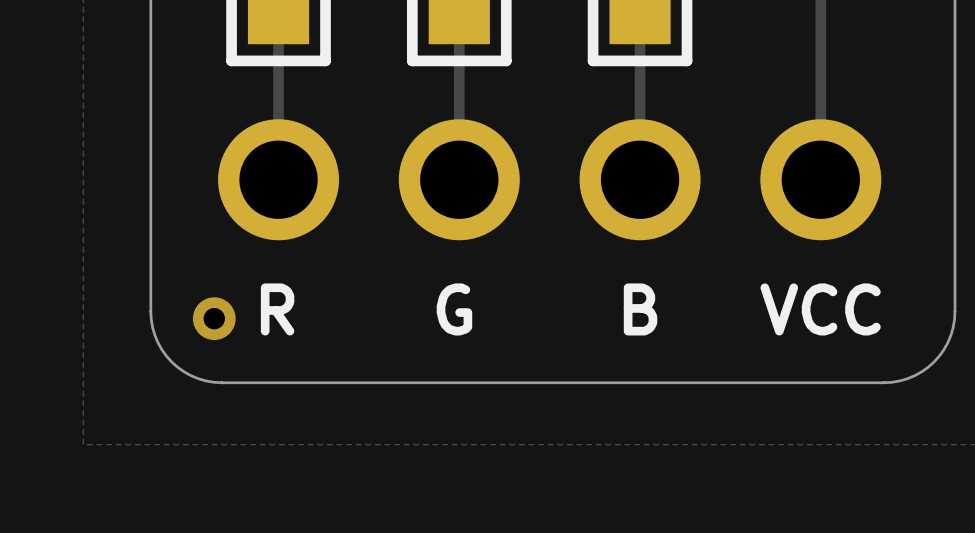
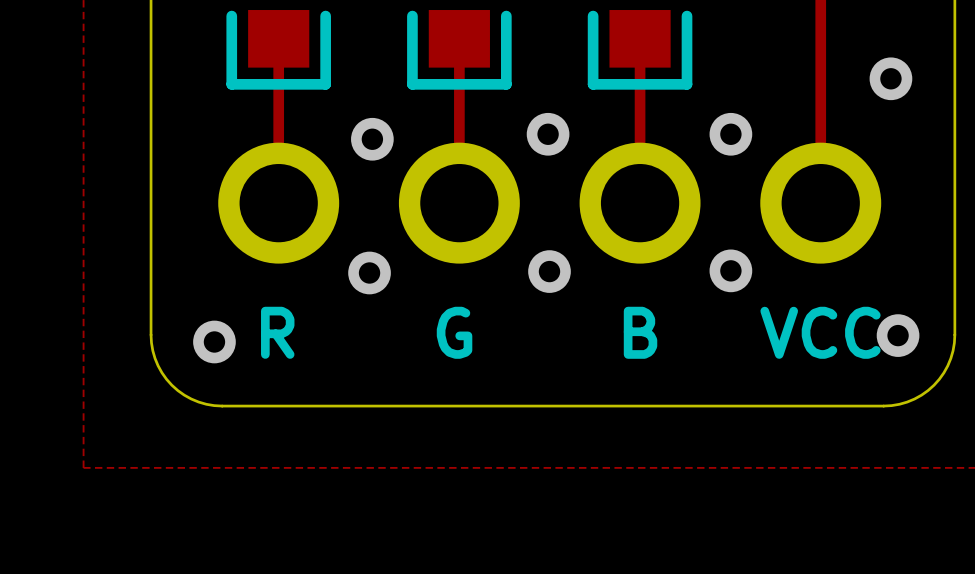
via: none -> (890, 78)
via: none -> (548, 134)
via: none -> (730, 134)
via: none -> (372, 139)
via: none -> (730, 270)
via: none -> (549, 271)
via: none -> (369, 272)
via: none -> (898, 335)

